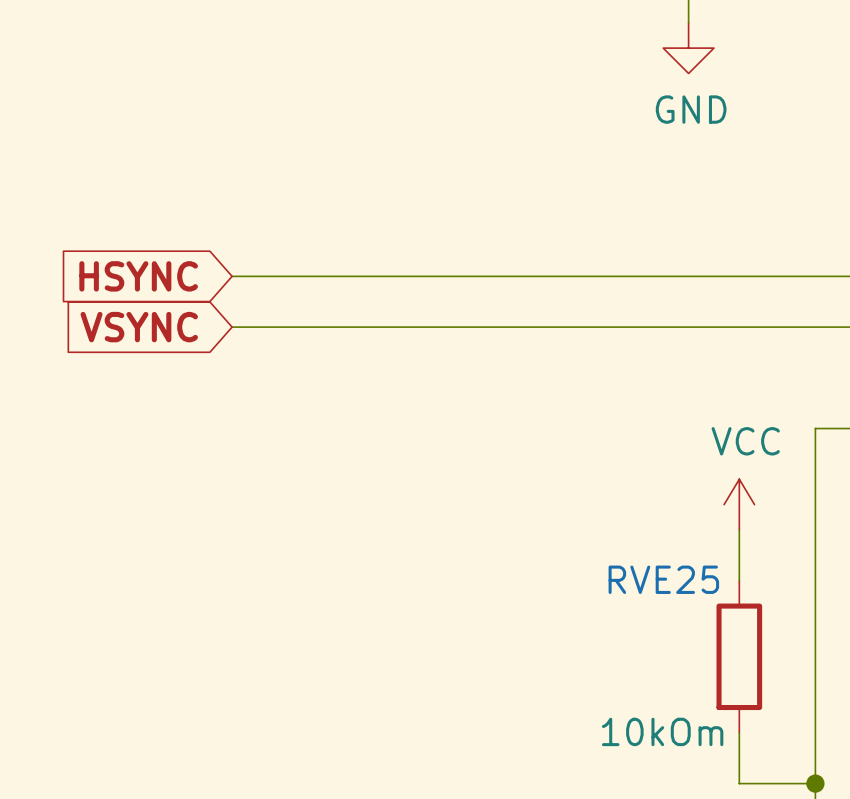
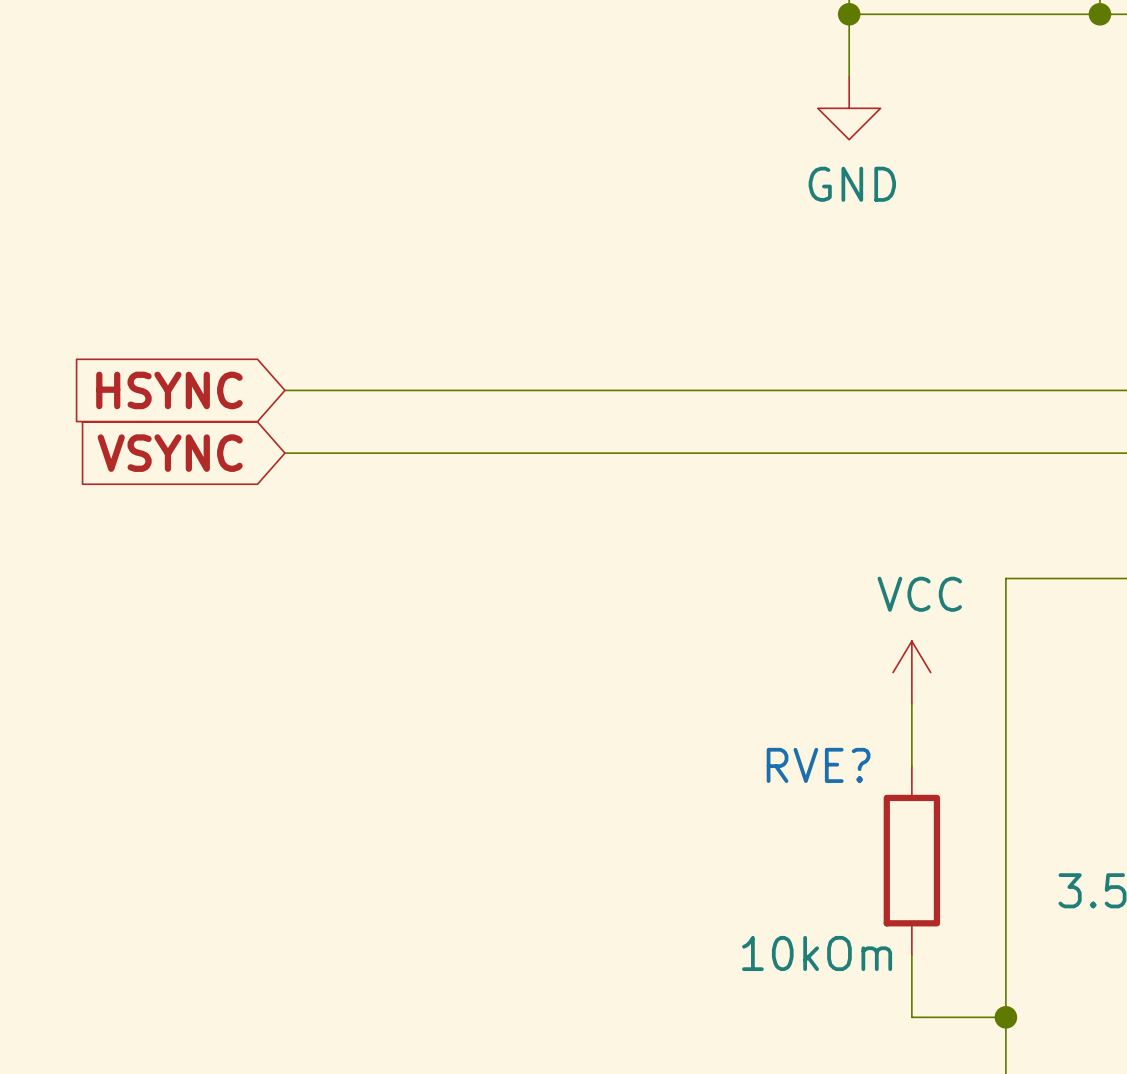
RVE25 name: RVE25 (663, 579) -> RVE? (818, 765)

